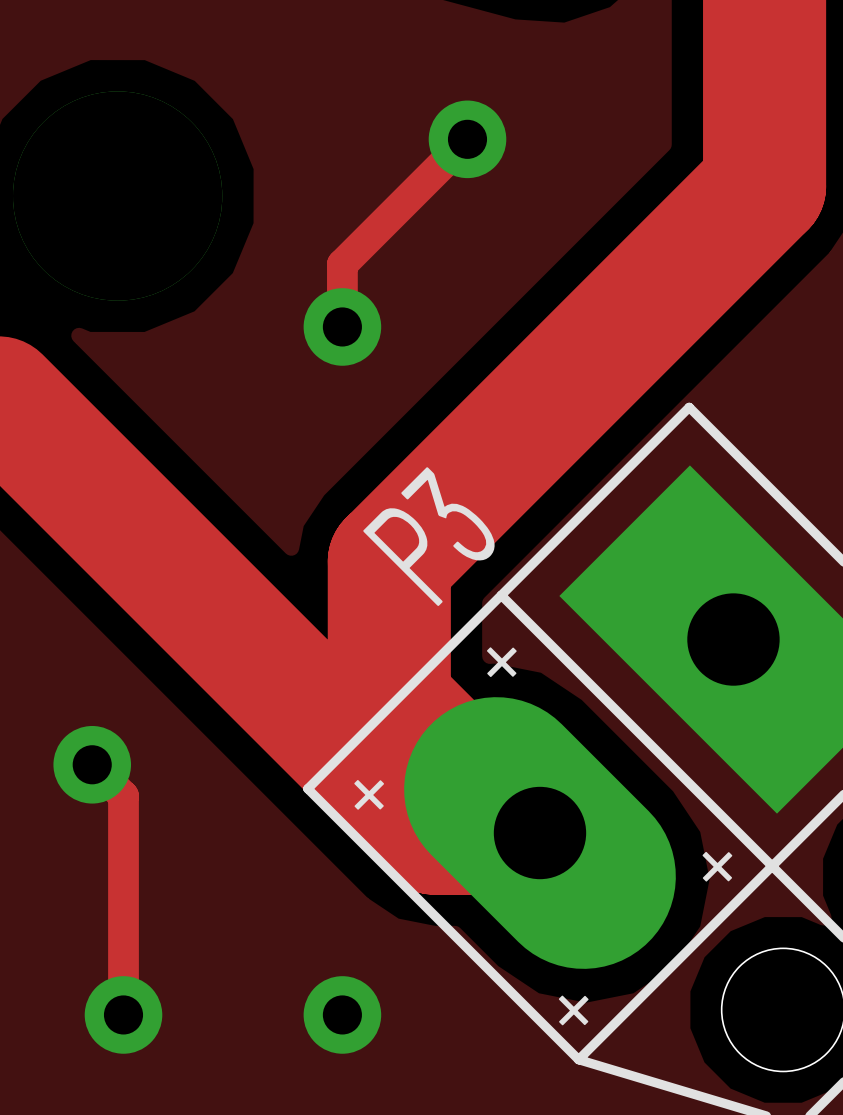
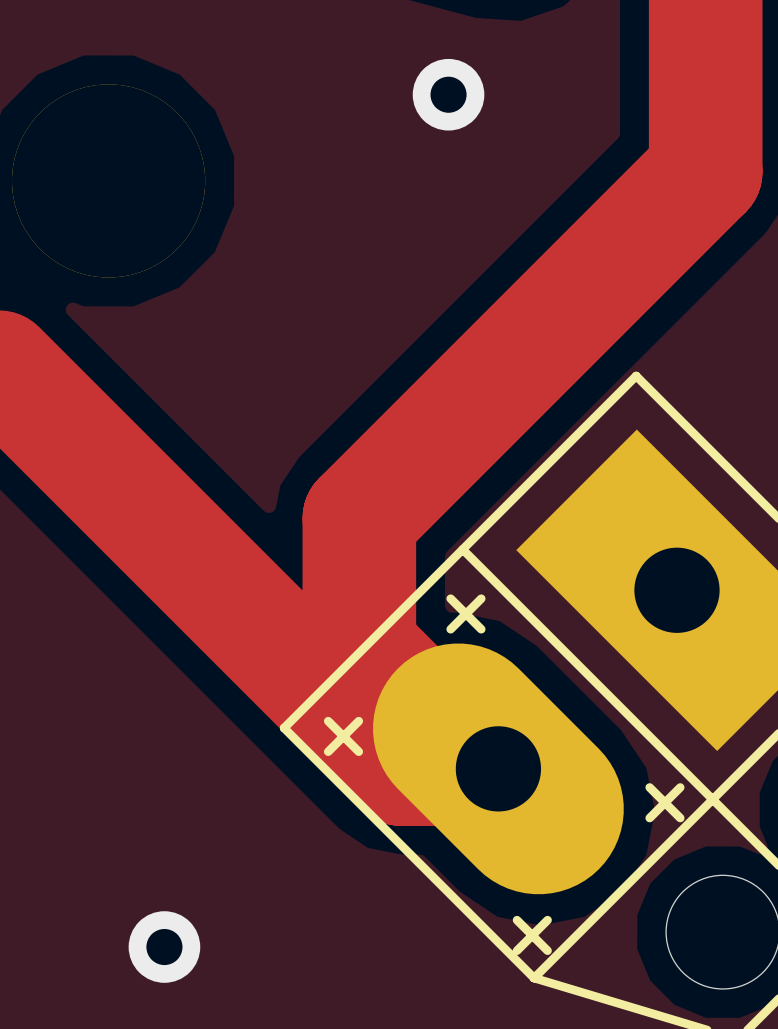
track: (467, 139) (342, 264) (342, 326) -> none
via position: (467, 139) -> (448, 94)
via: (342, 326) -> none
P3 name: P3 (428, 536) -> none
track: (92, 764) (123, 796) (123, 1014) -> none
via: (92, 764) -> none
via position: (123, 1014) -> (164, 947)
via: (342, 1014) -> none

